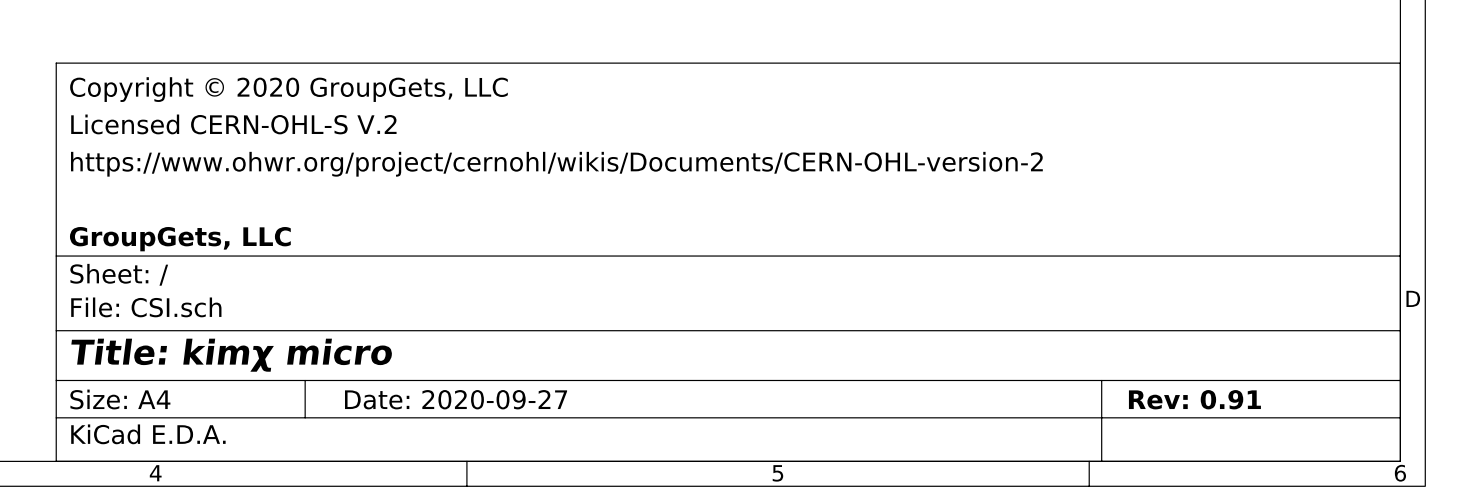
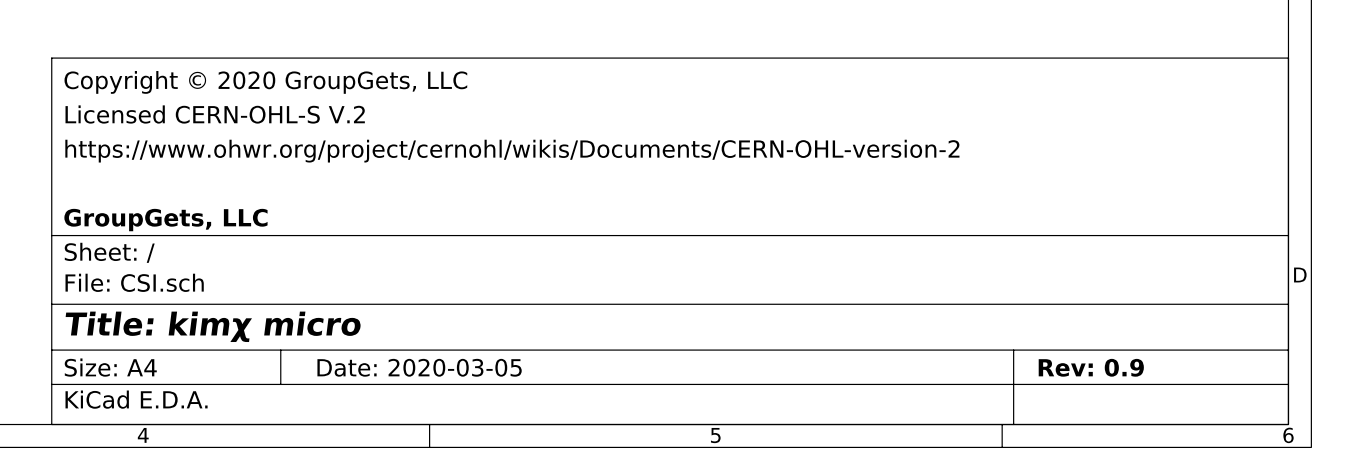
title block: Date: 2020-09-27 (456, 399) -> Date: 2020-03-05 (419, 367)
title block: Rev: 0.91 (1194, 399) -> Rev: 0.9 (1091, 367)

